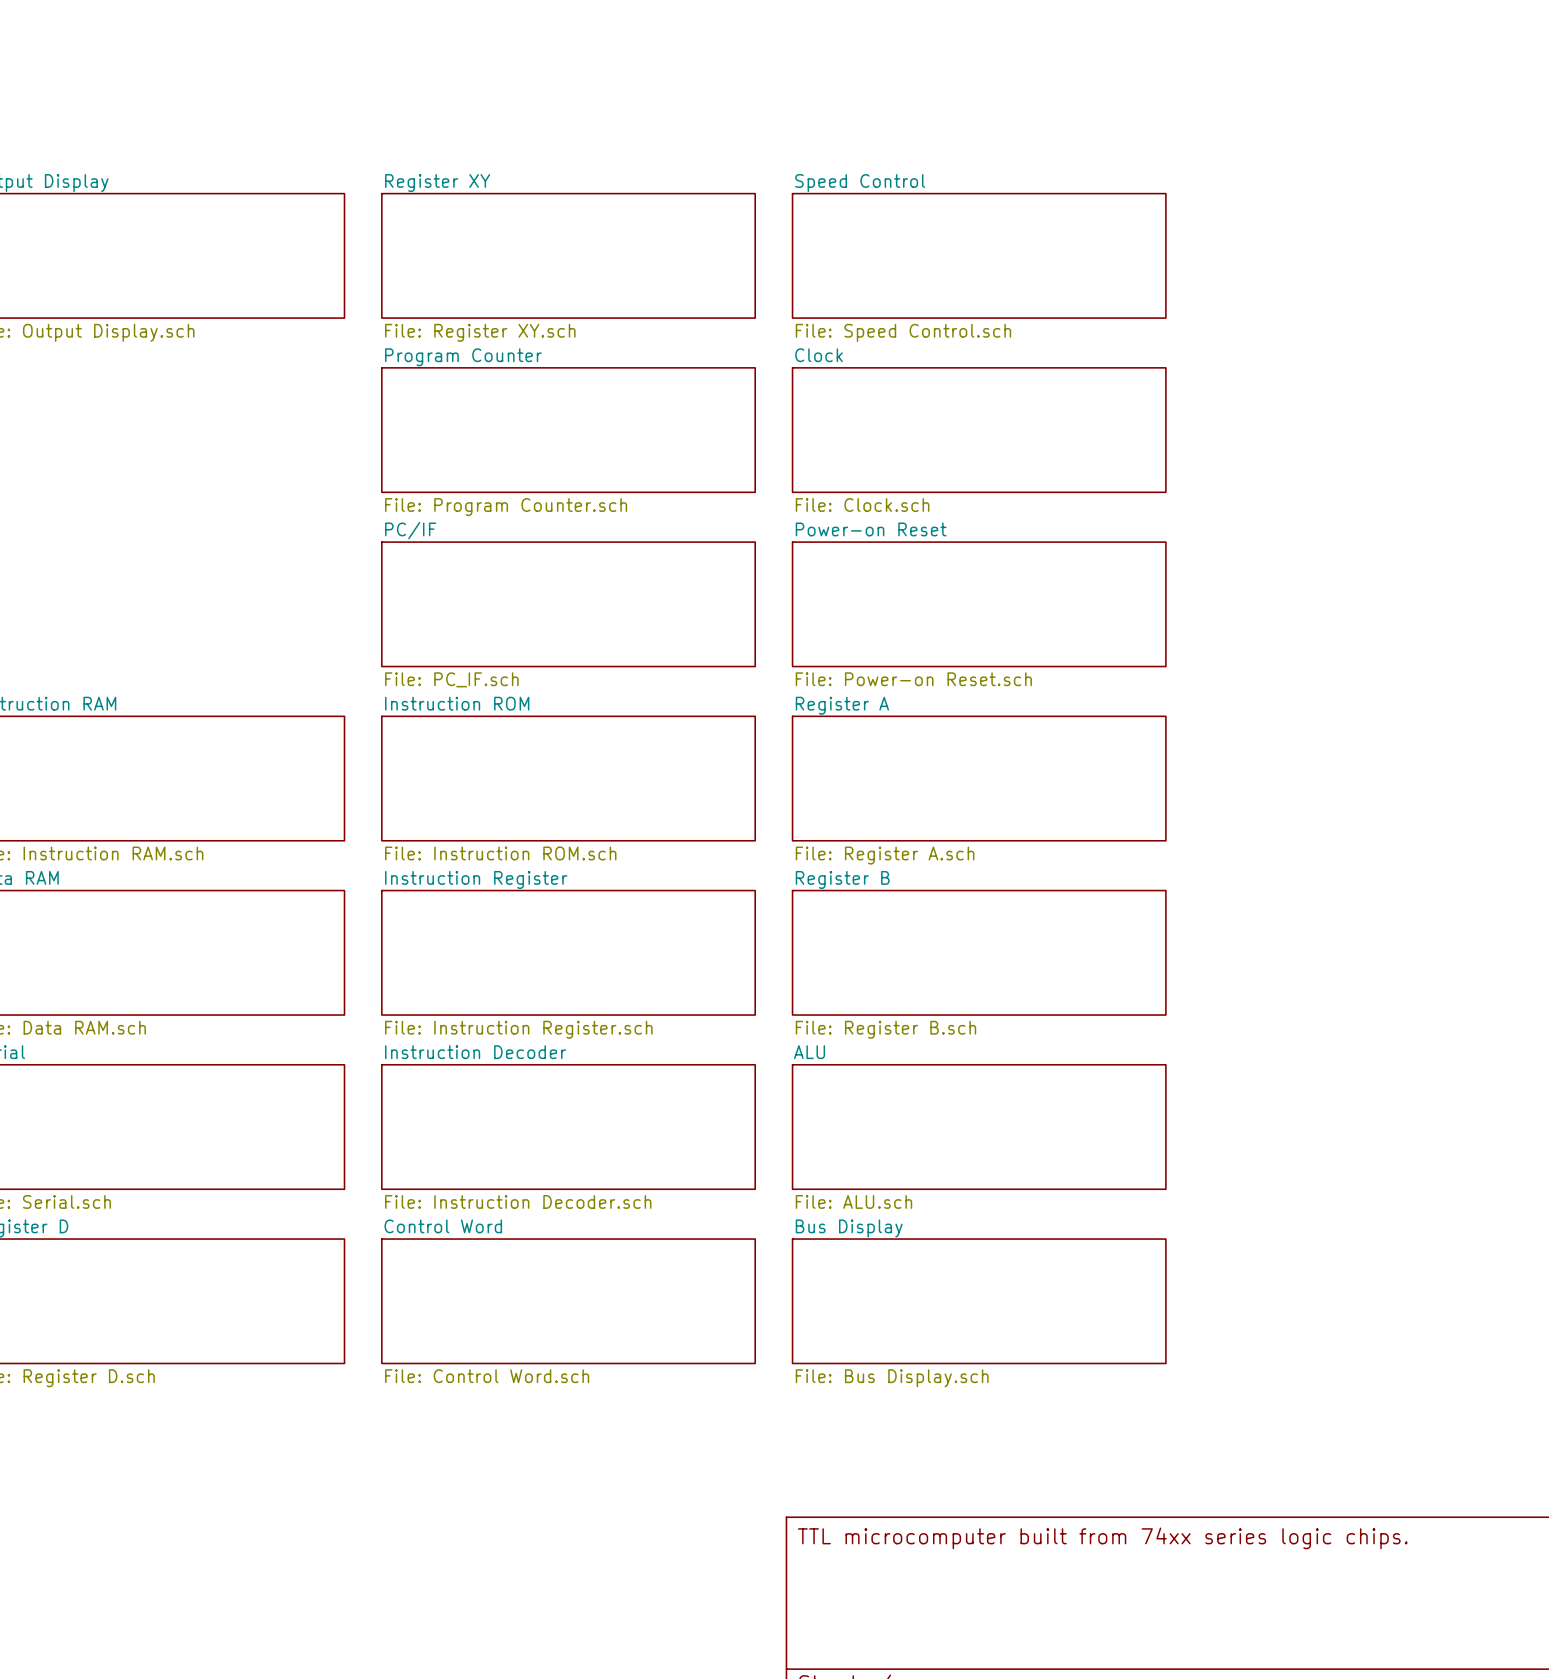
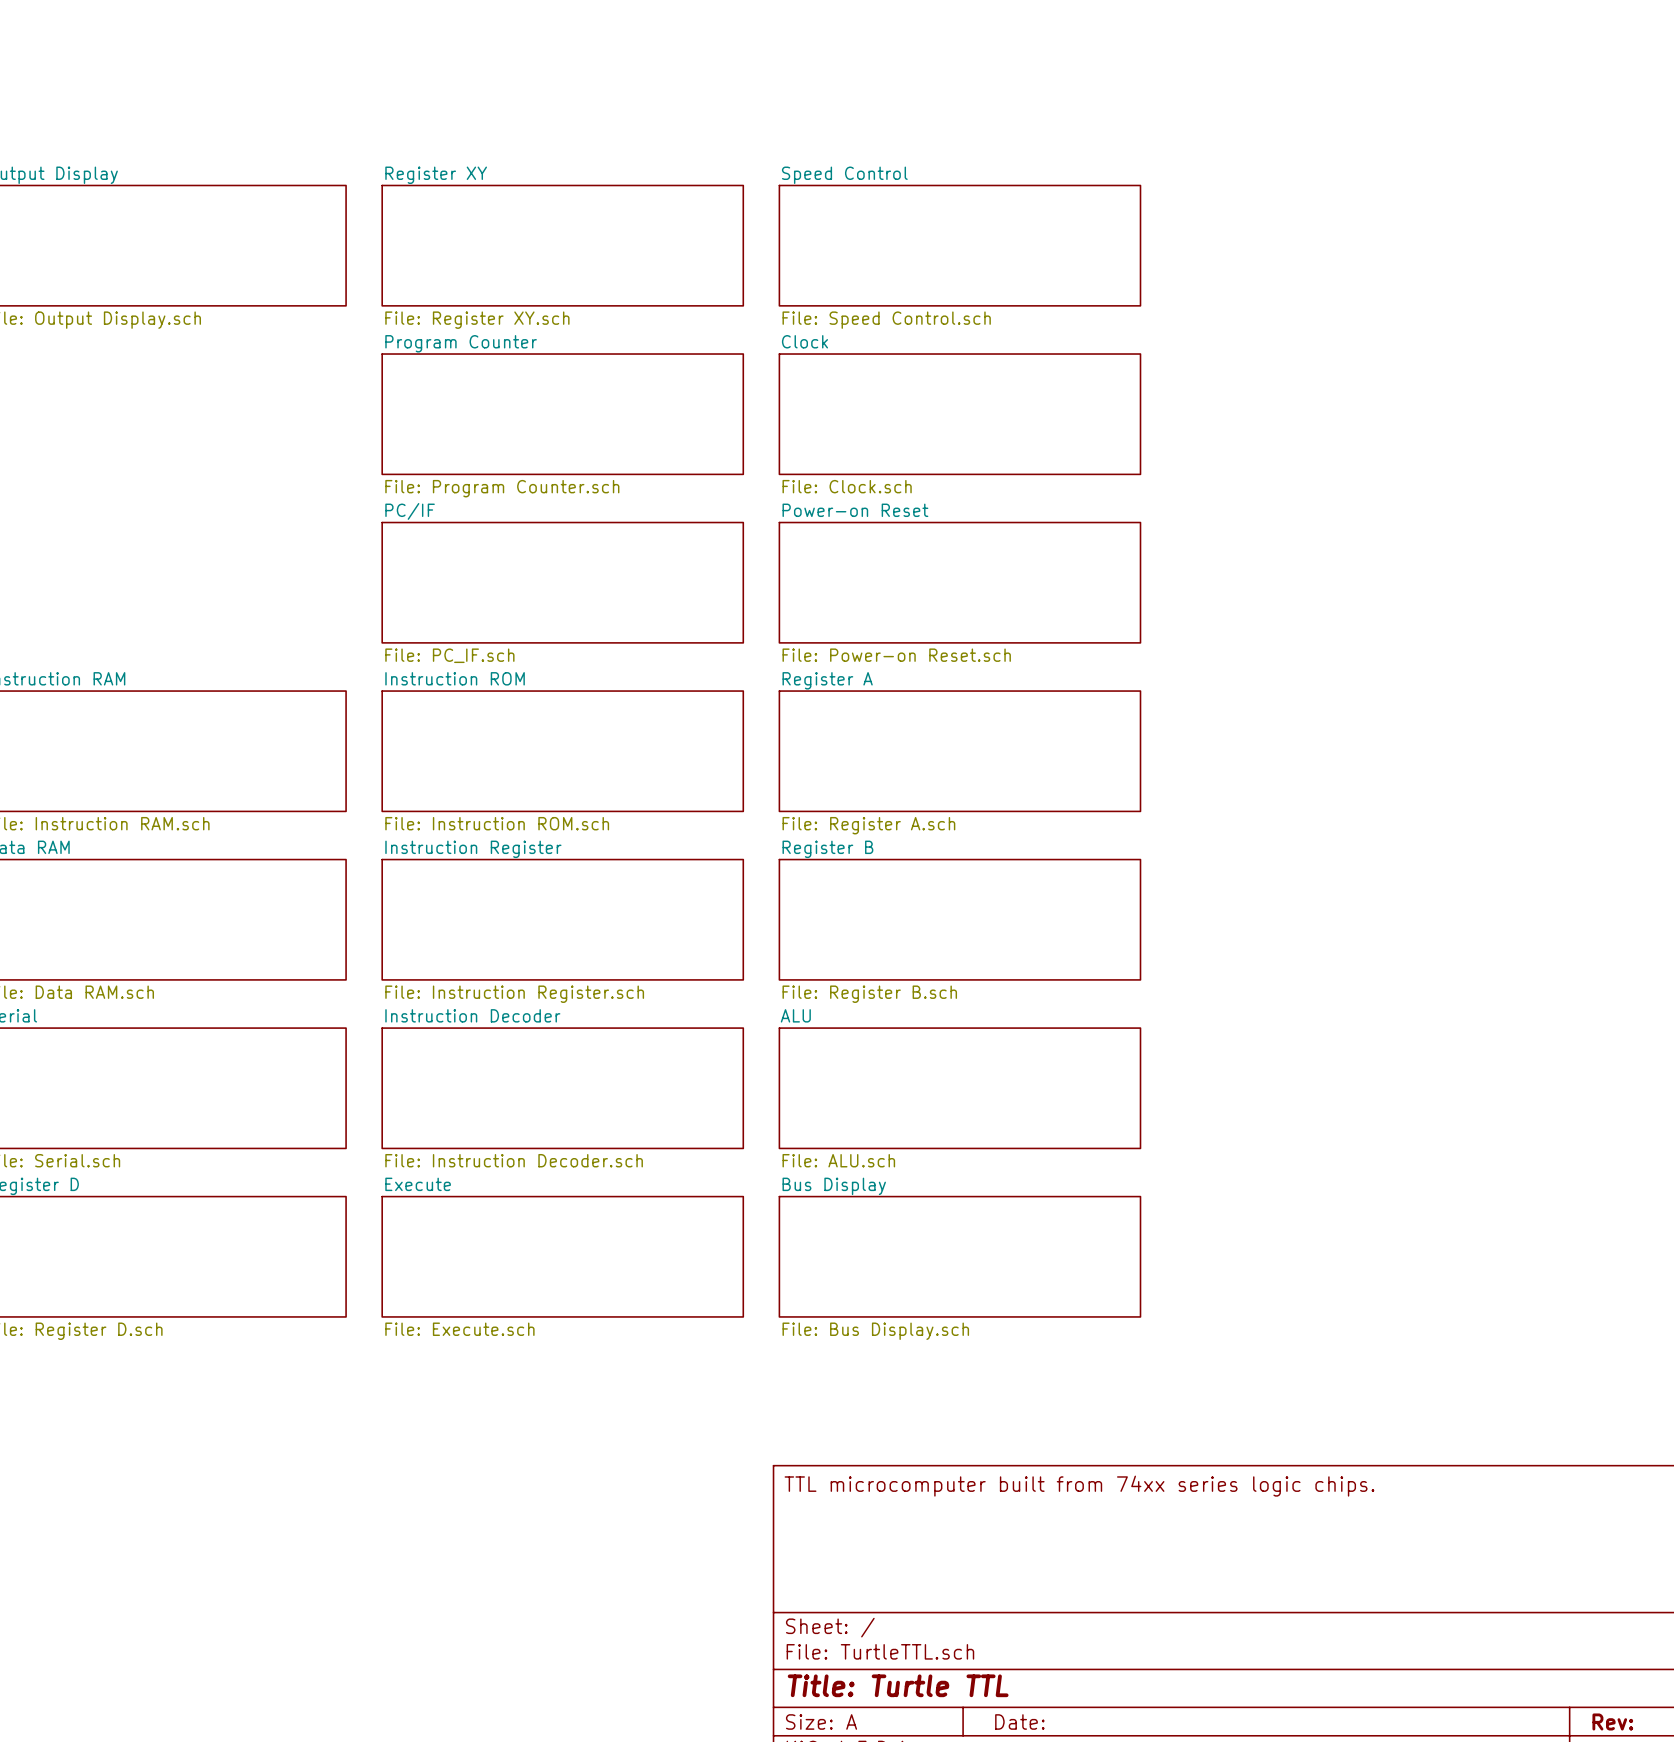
sheet Control Word name: Control Word (443, 1226) -> Execute (418, 1184)
sheet Control Word value: File: Control Word.sch (487, 1376) -> File: Execute.sch (459, 1329)

